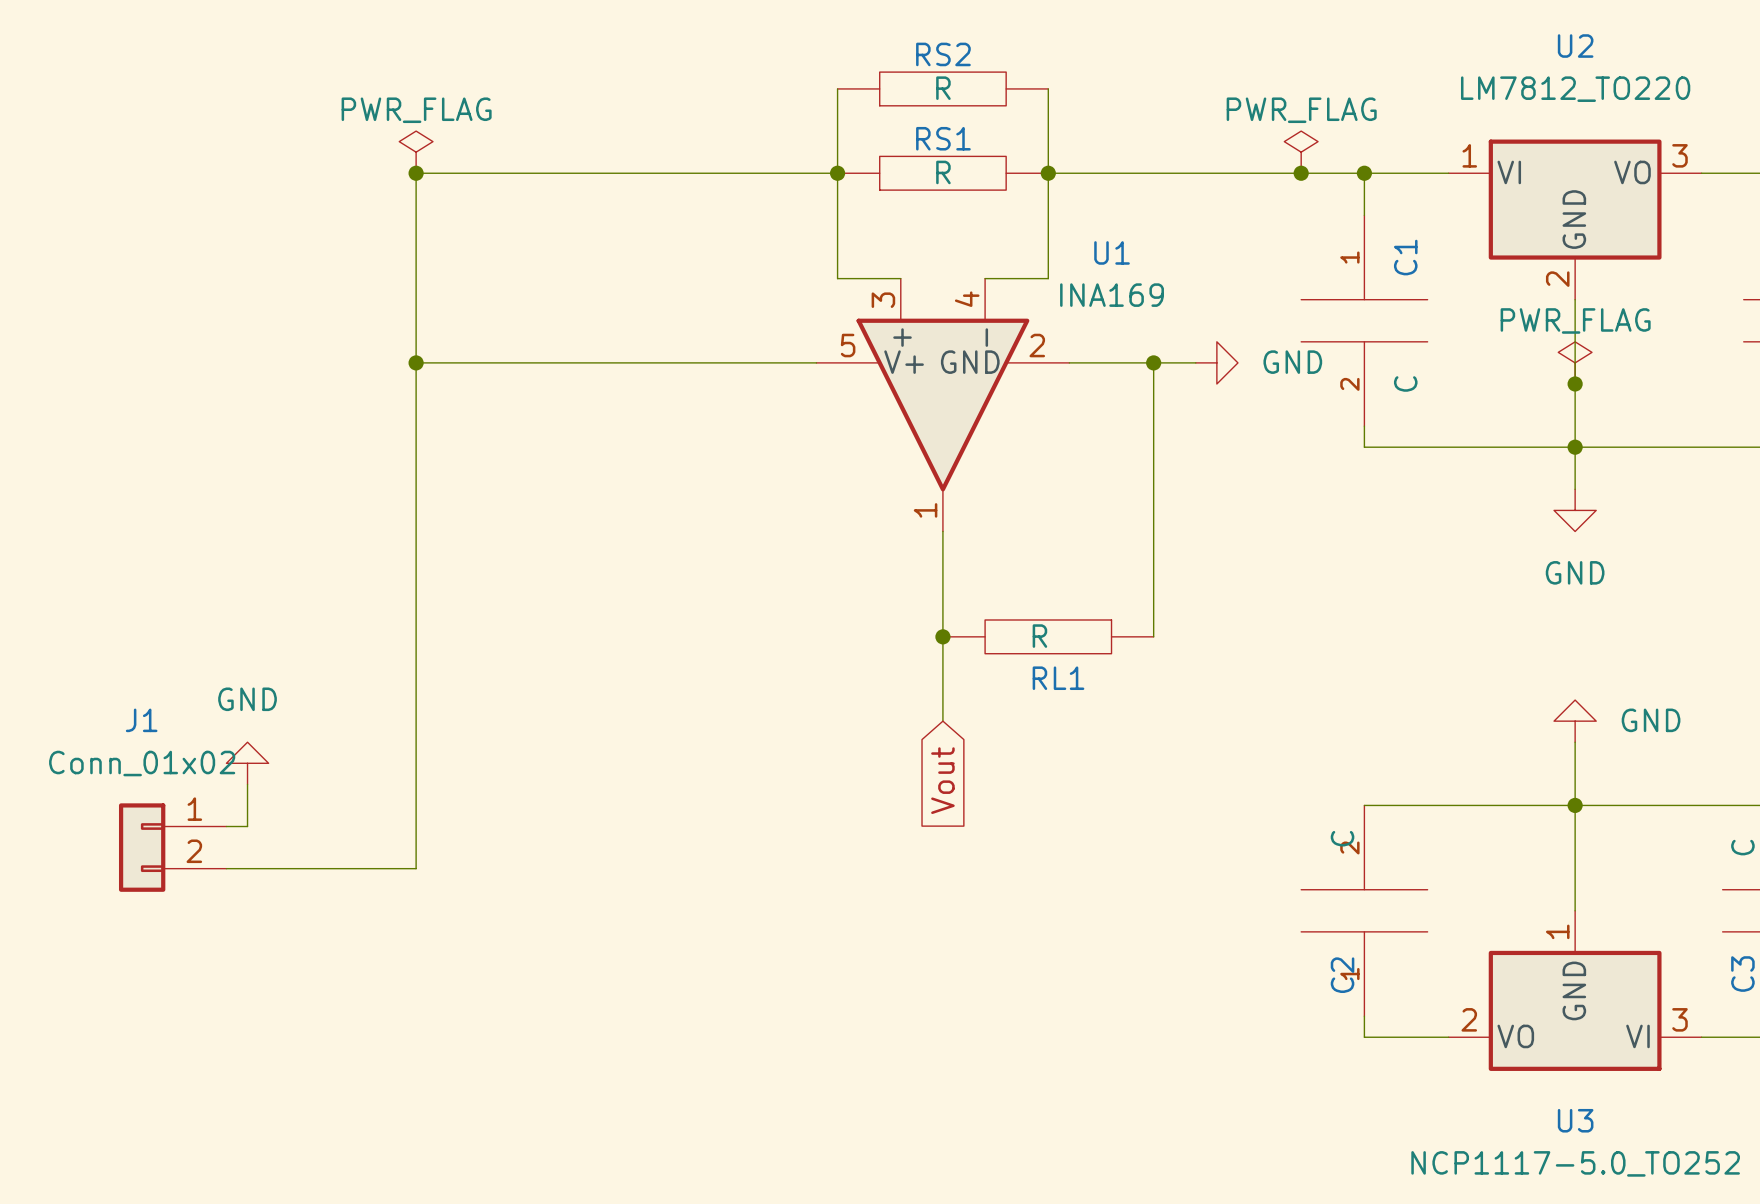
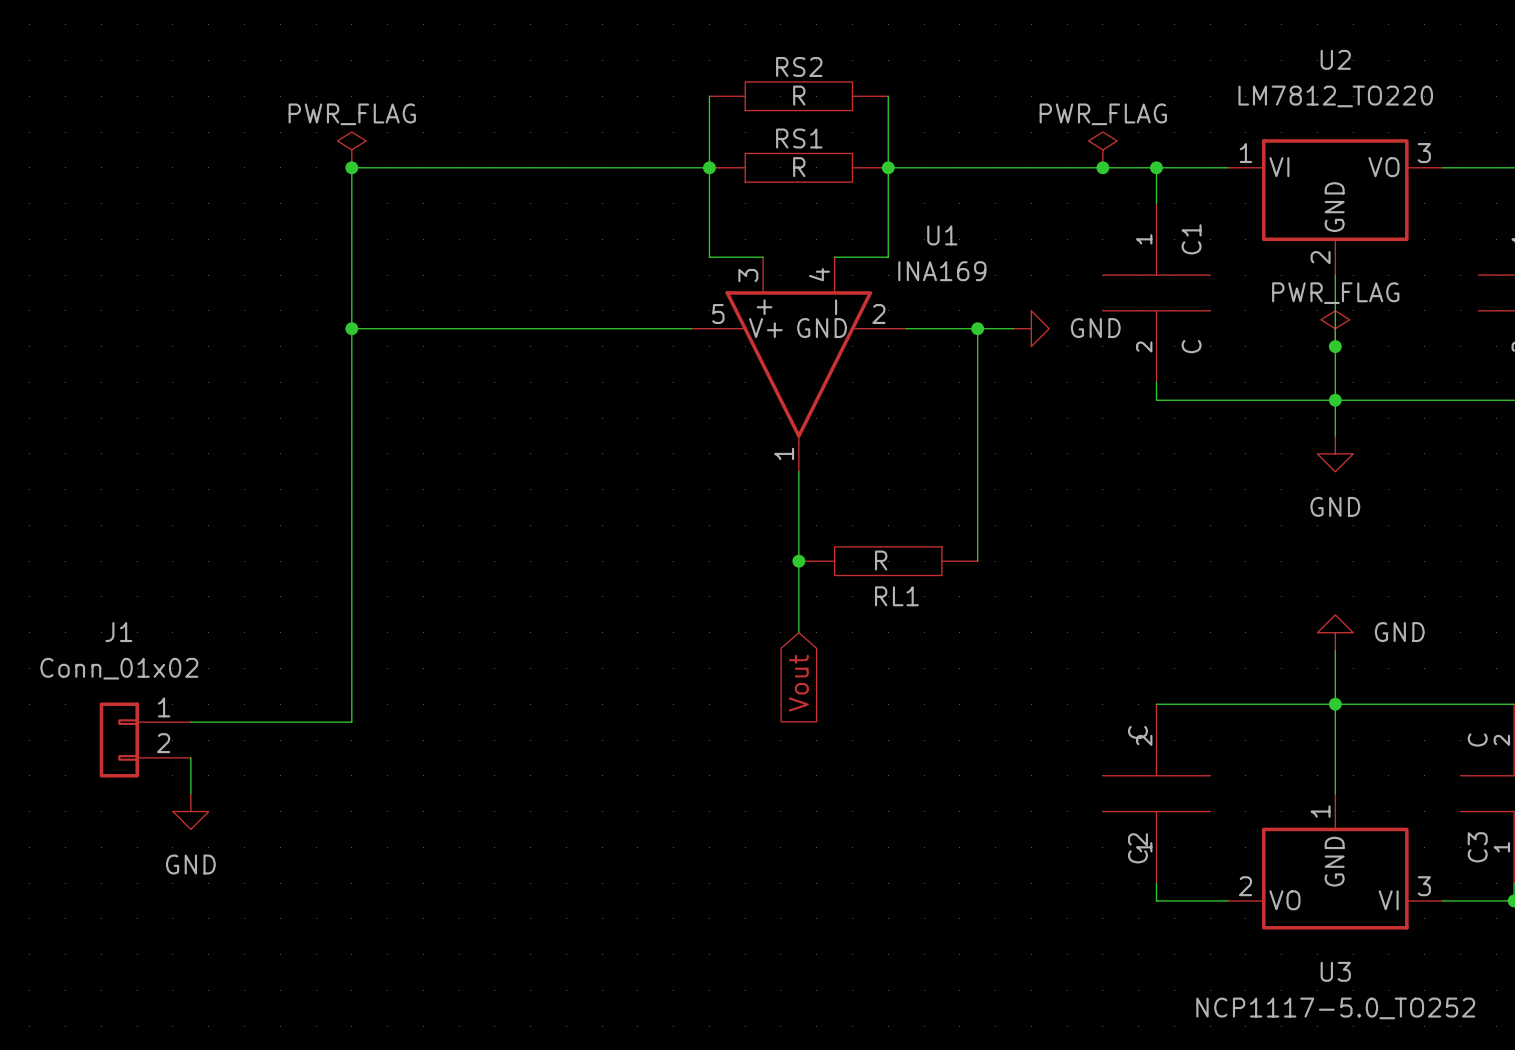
power symbol rotation: 0° (247, 763) -> 180° (190, 811)
power symbol position: GND (247, 763) -> GND (190, 811)
wire: (247, 784) (247, 826) -> (190, 757) (190, 793)
wire: (416, 826) (416, 868) (226, 868) -> (351, 722) (208, 722)

